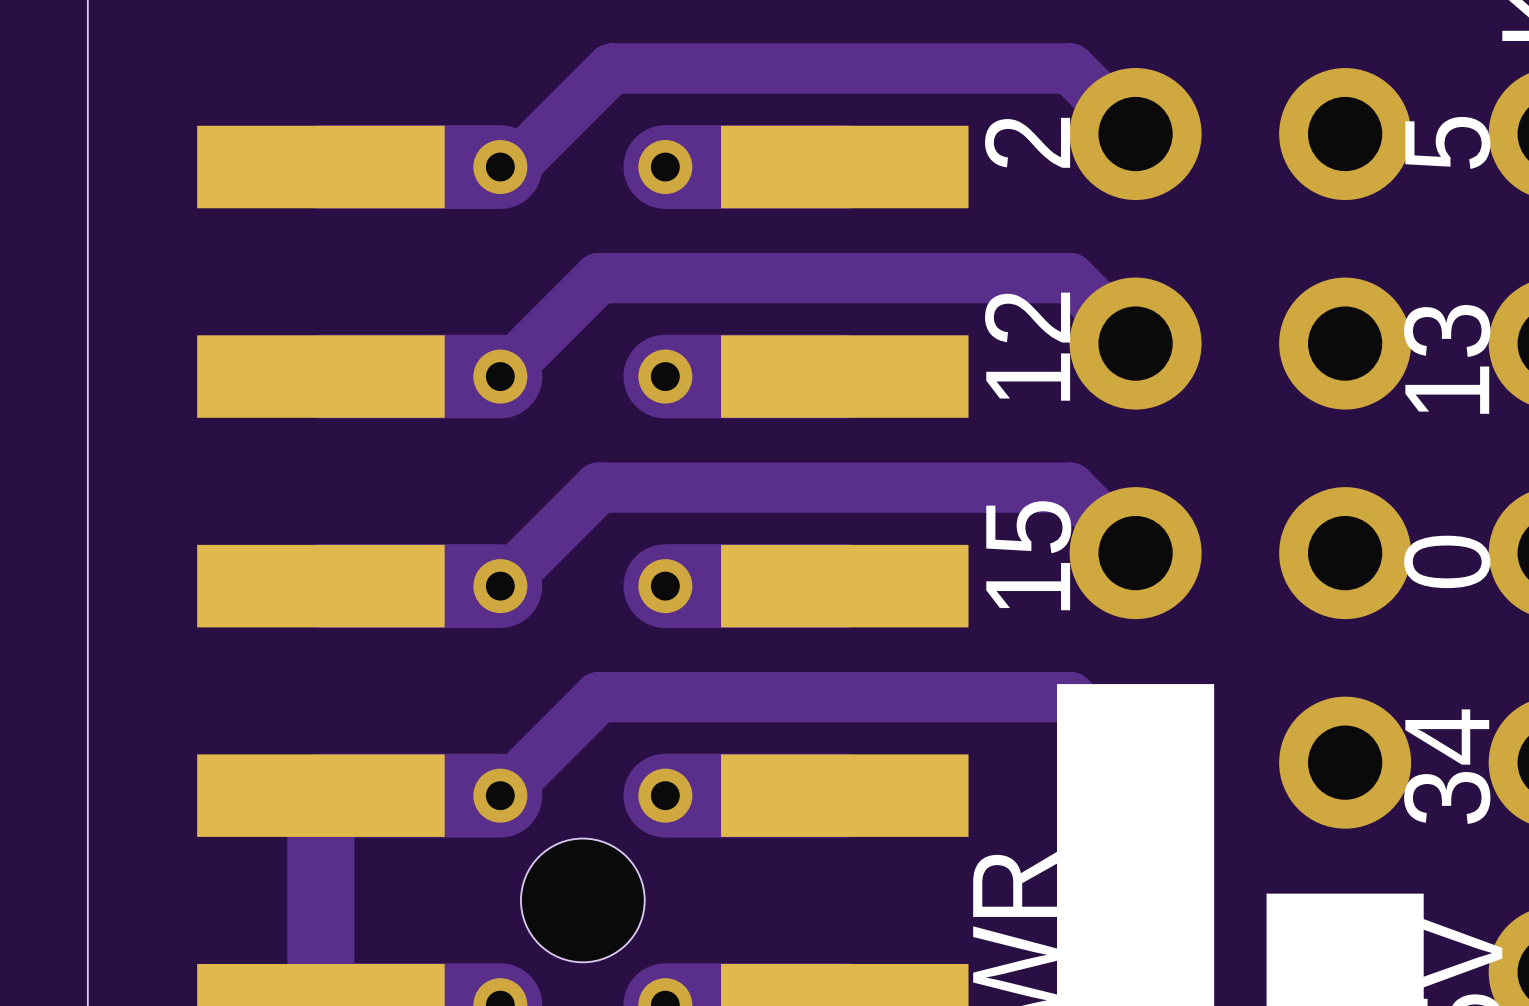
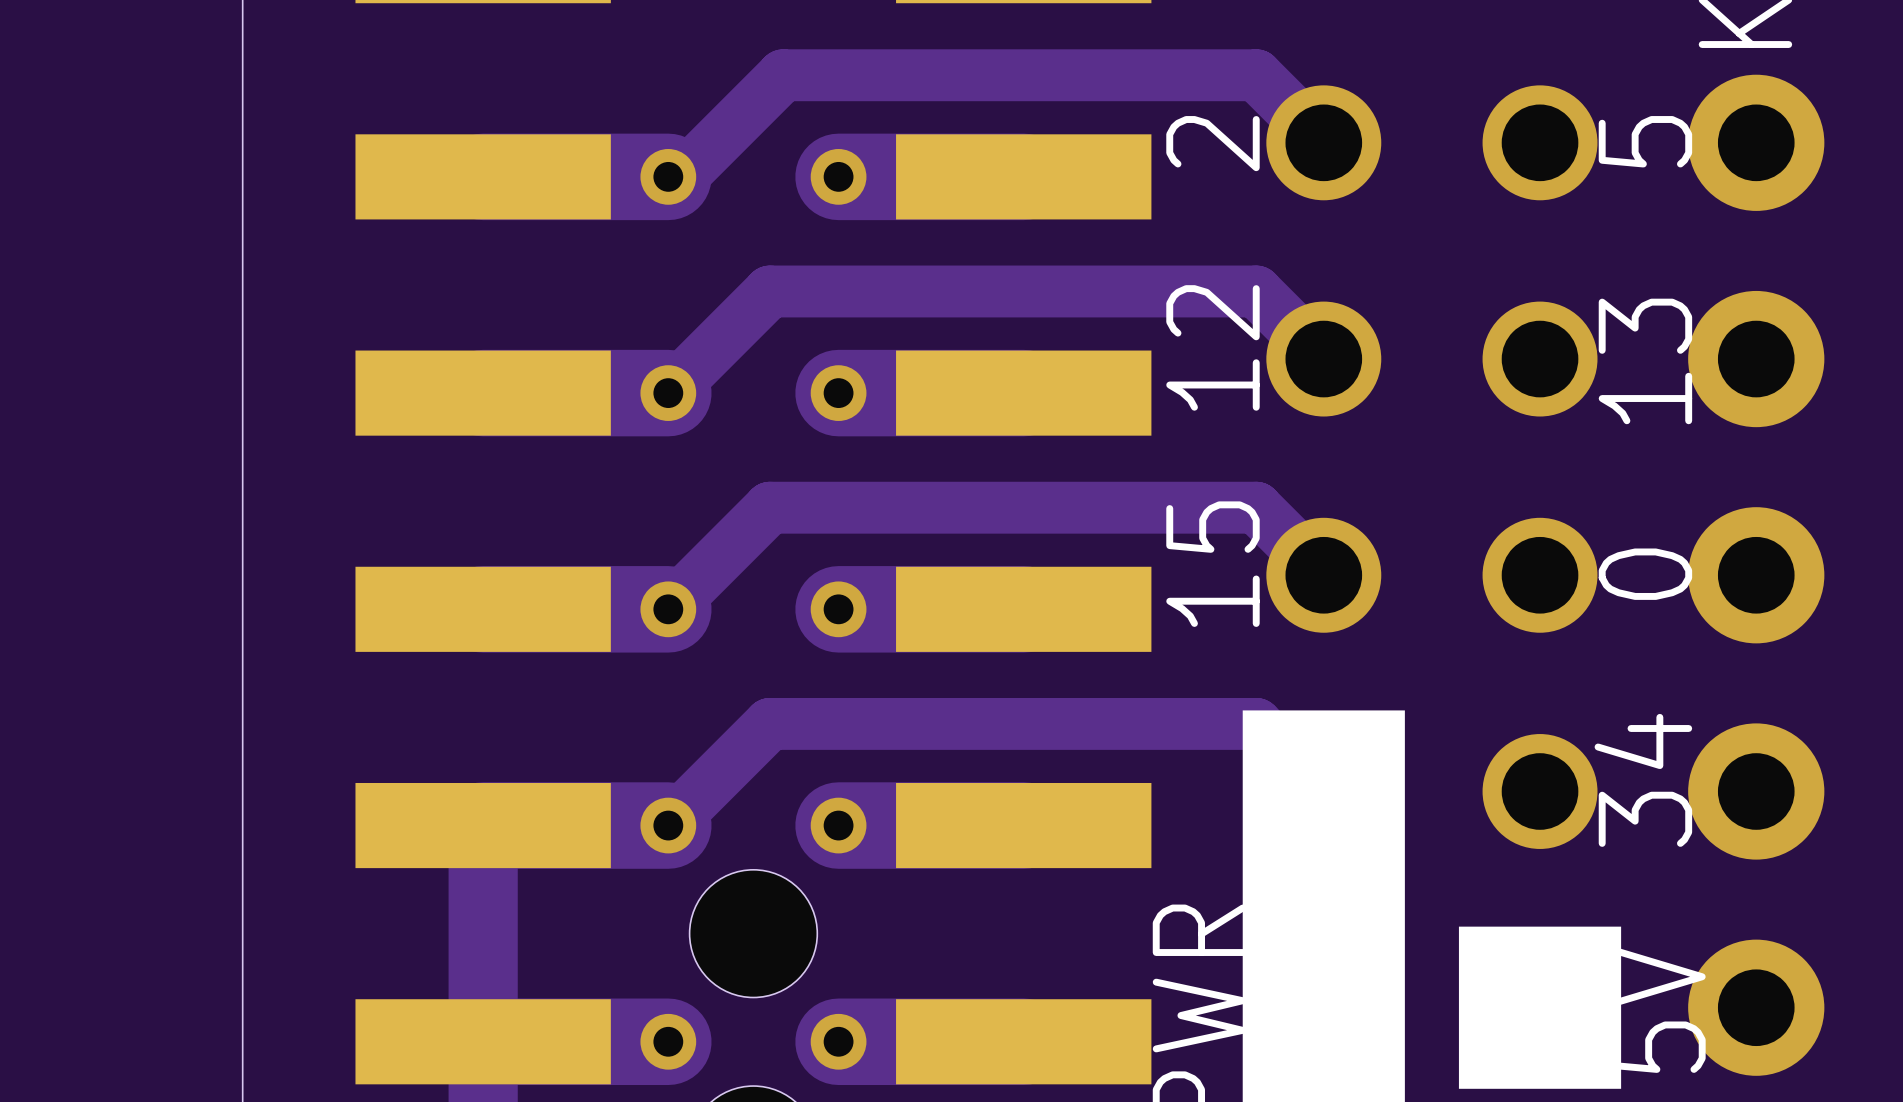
via size: [1069, 68, 1202, 201] -> [1266, 85, 1382, 201]
via size: [1279, 68, 1412, 201] -> [1482, 85, 1598, 201]
via size: [1069, 277, 1202, 410] -> [1266, 301, 1382, 417]
via size: [1279, 277, 1412, 410] -> [1482, 301, 1598, 417]
via size: [1069, 487, 1202, 620] -> [1266, 517, 1382, 633]
via size: [1279, 487, 1412, 620] -> [1482, 517, 1598, 633]
via size: [1279, 696, 1412, 829] -> [1482, 734, 1598, 849]

